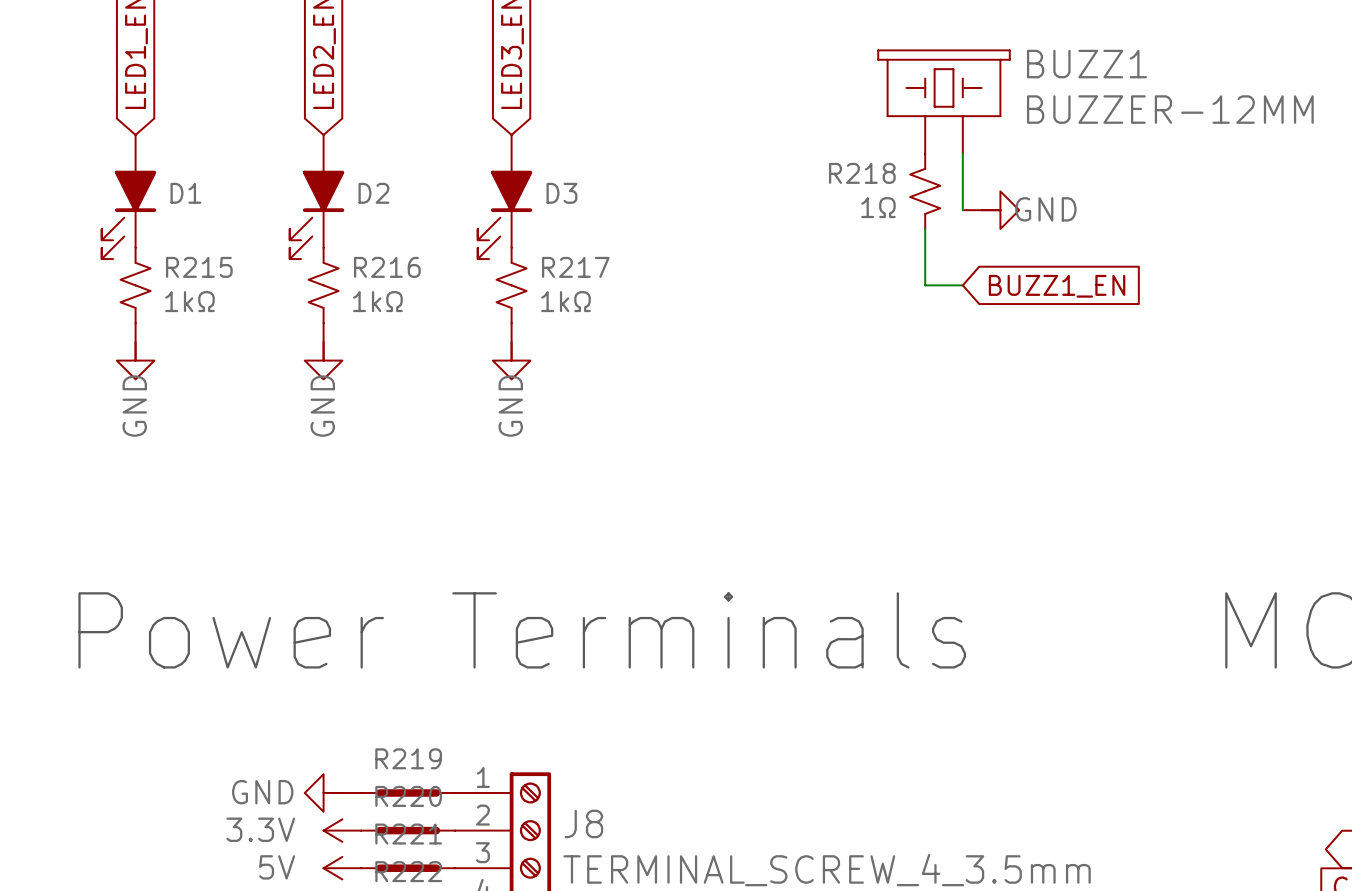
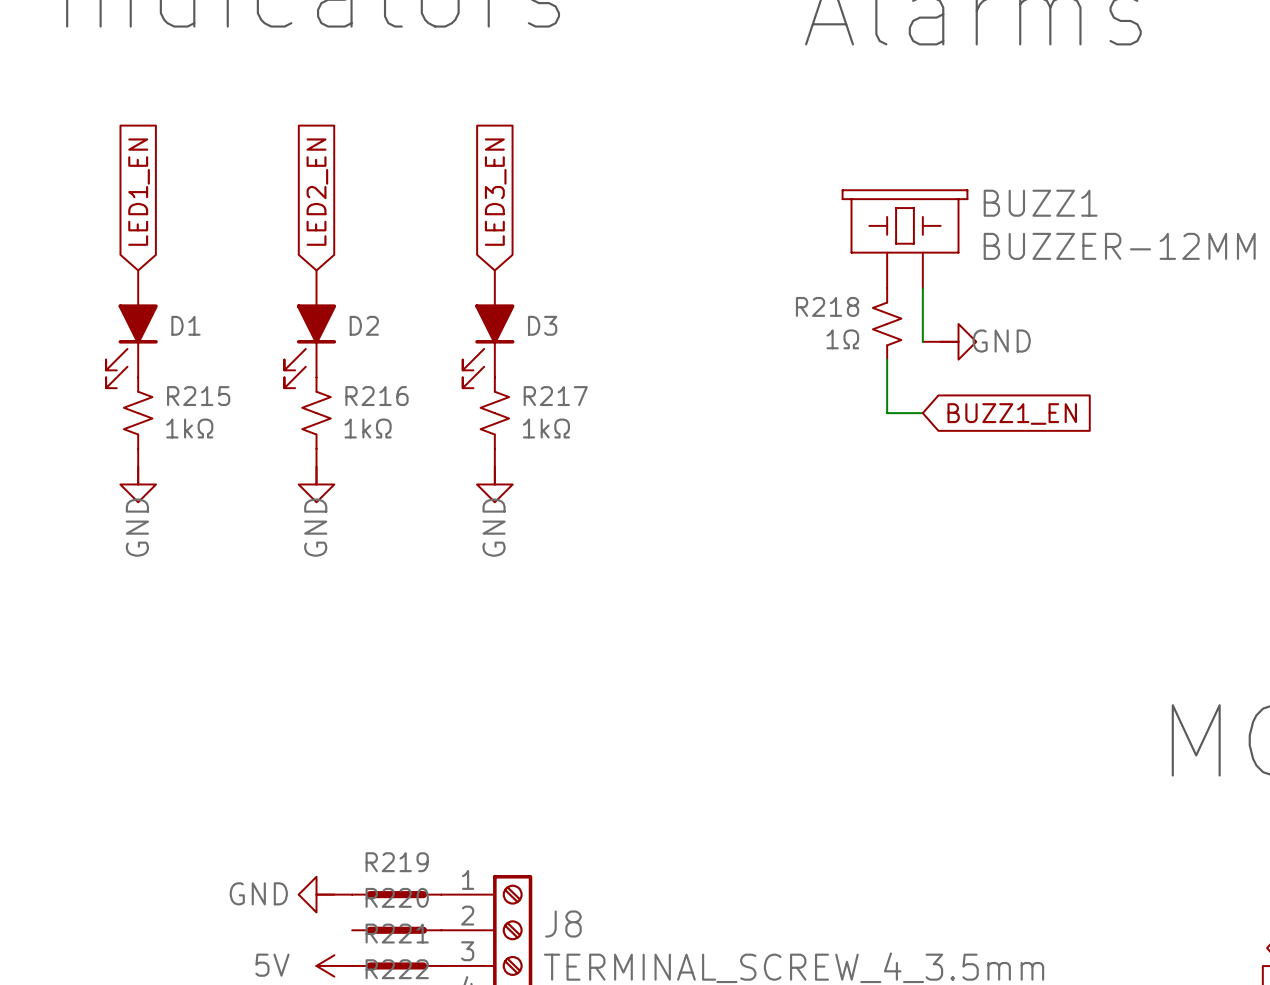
text: Power Terminals (522, 630) -> none
power symbol: 3.3V (342, 830) -> none

